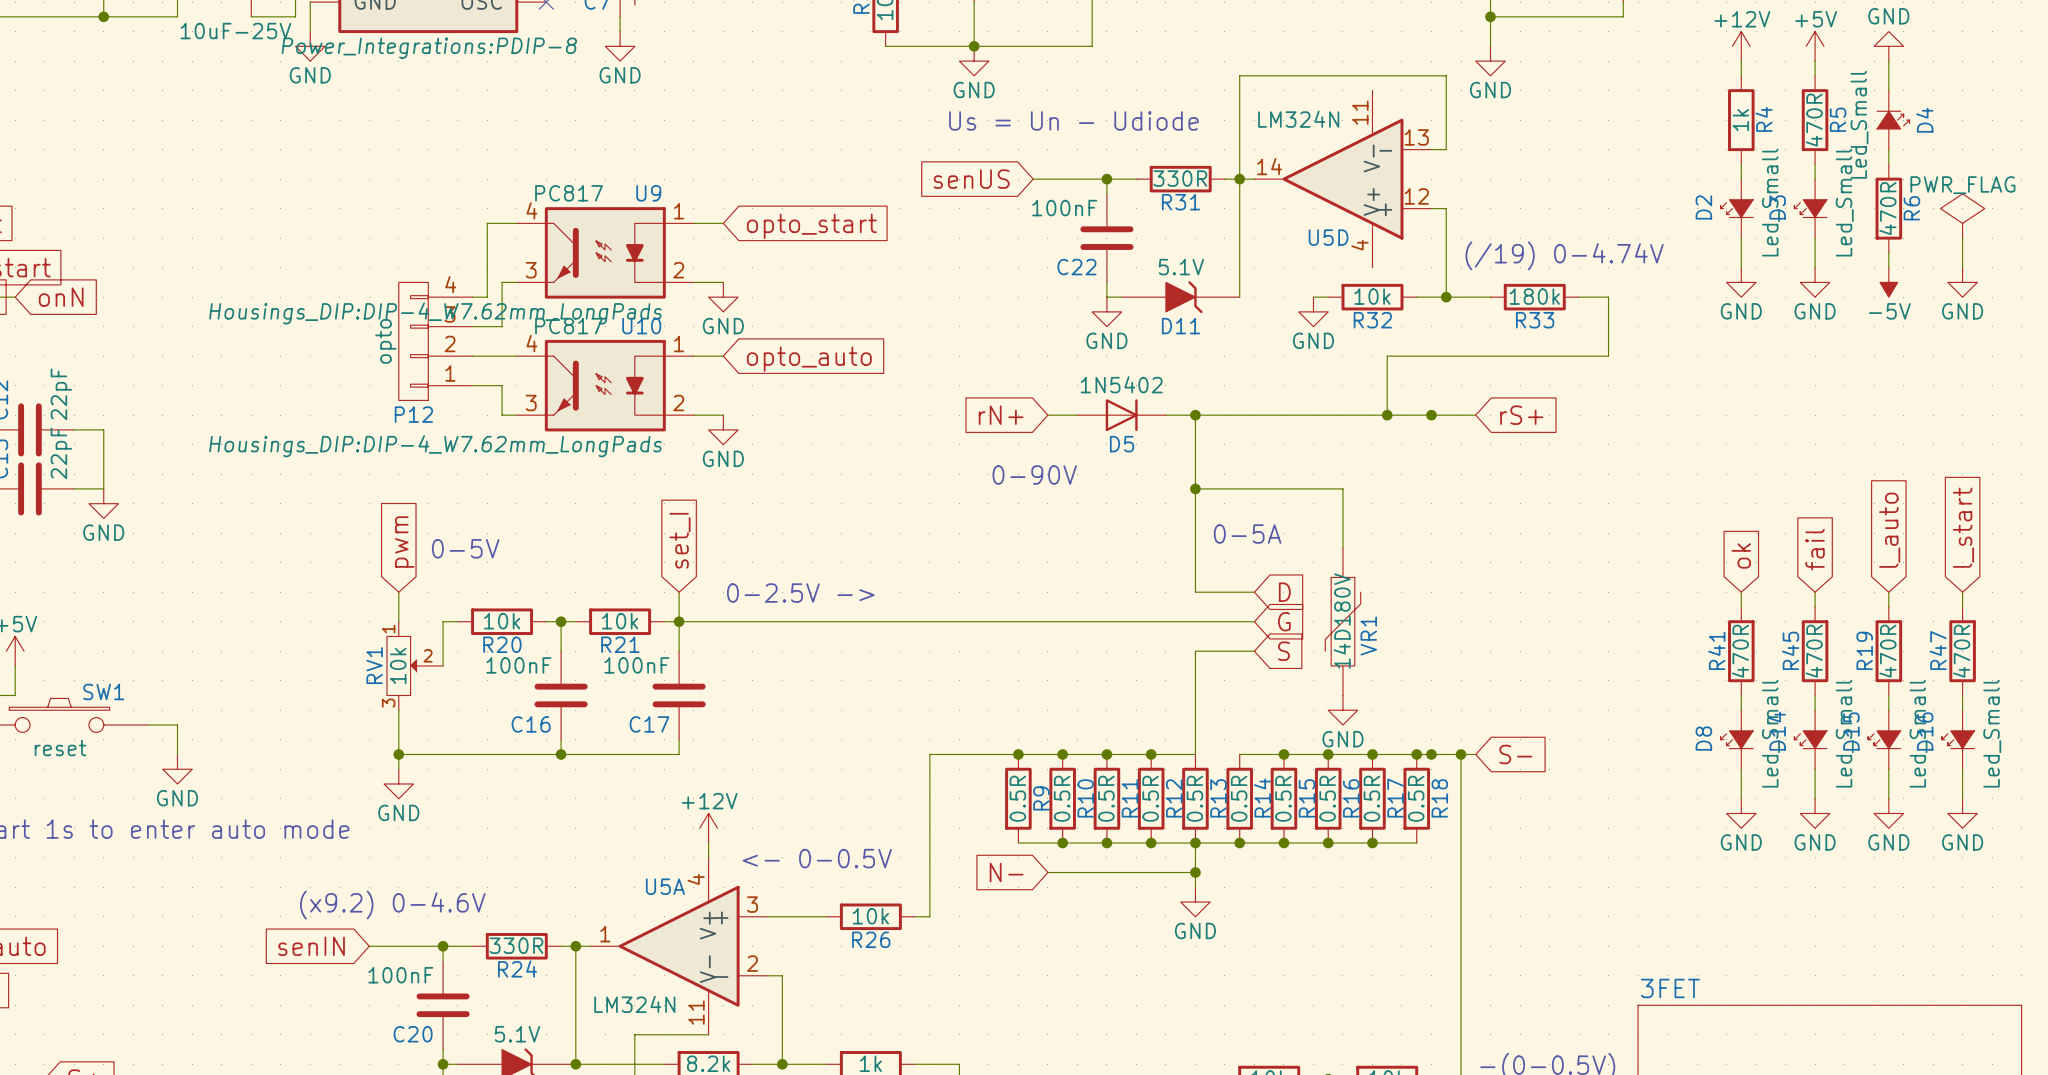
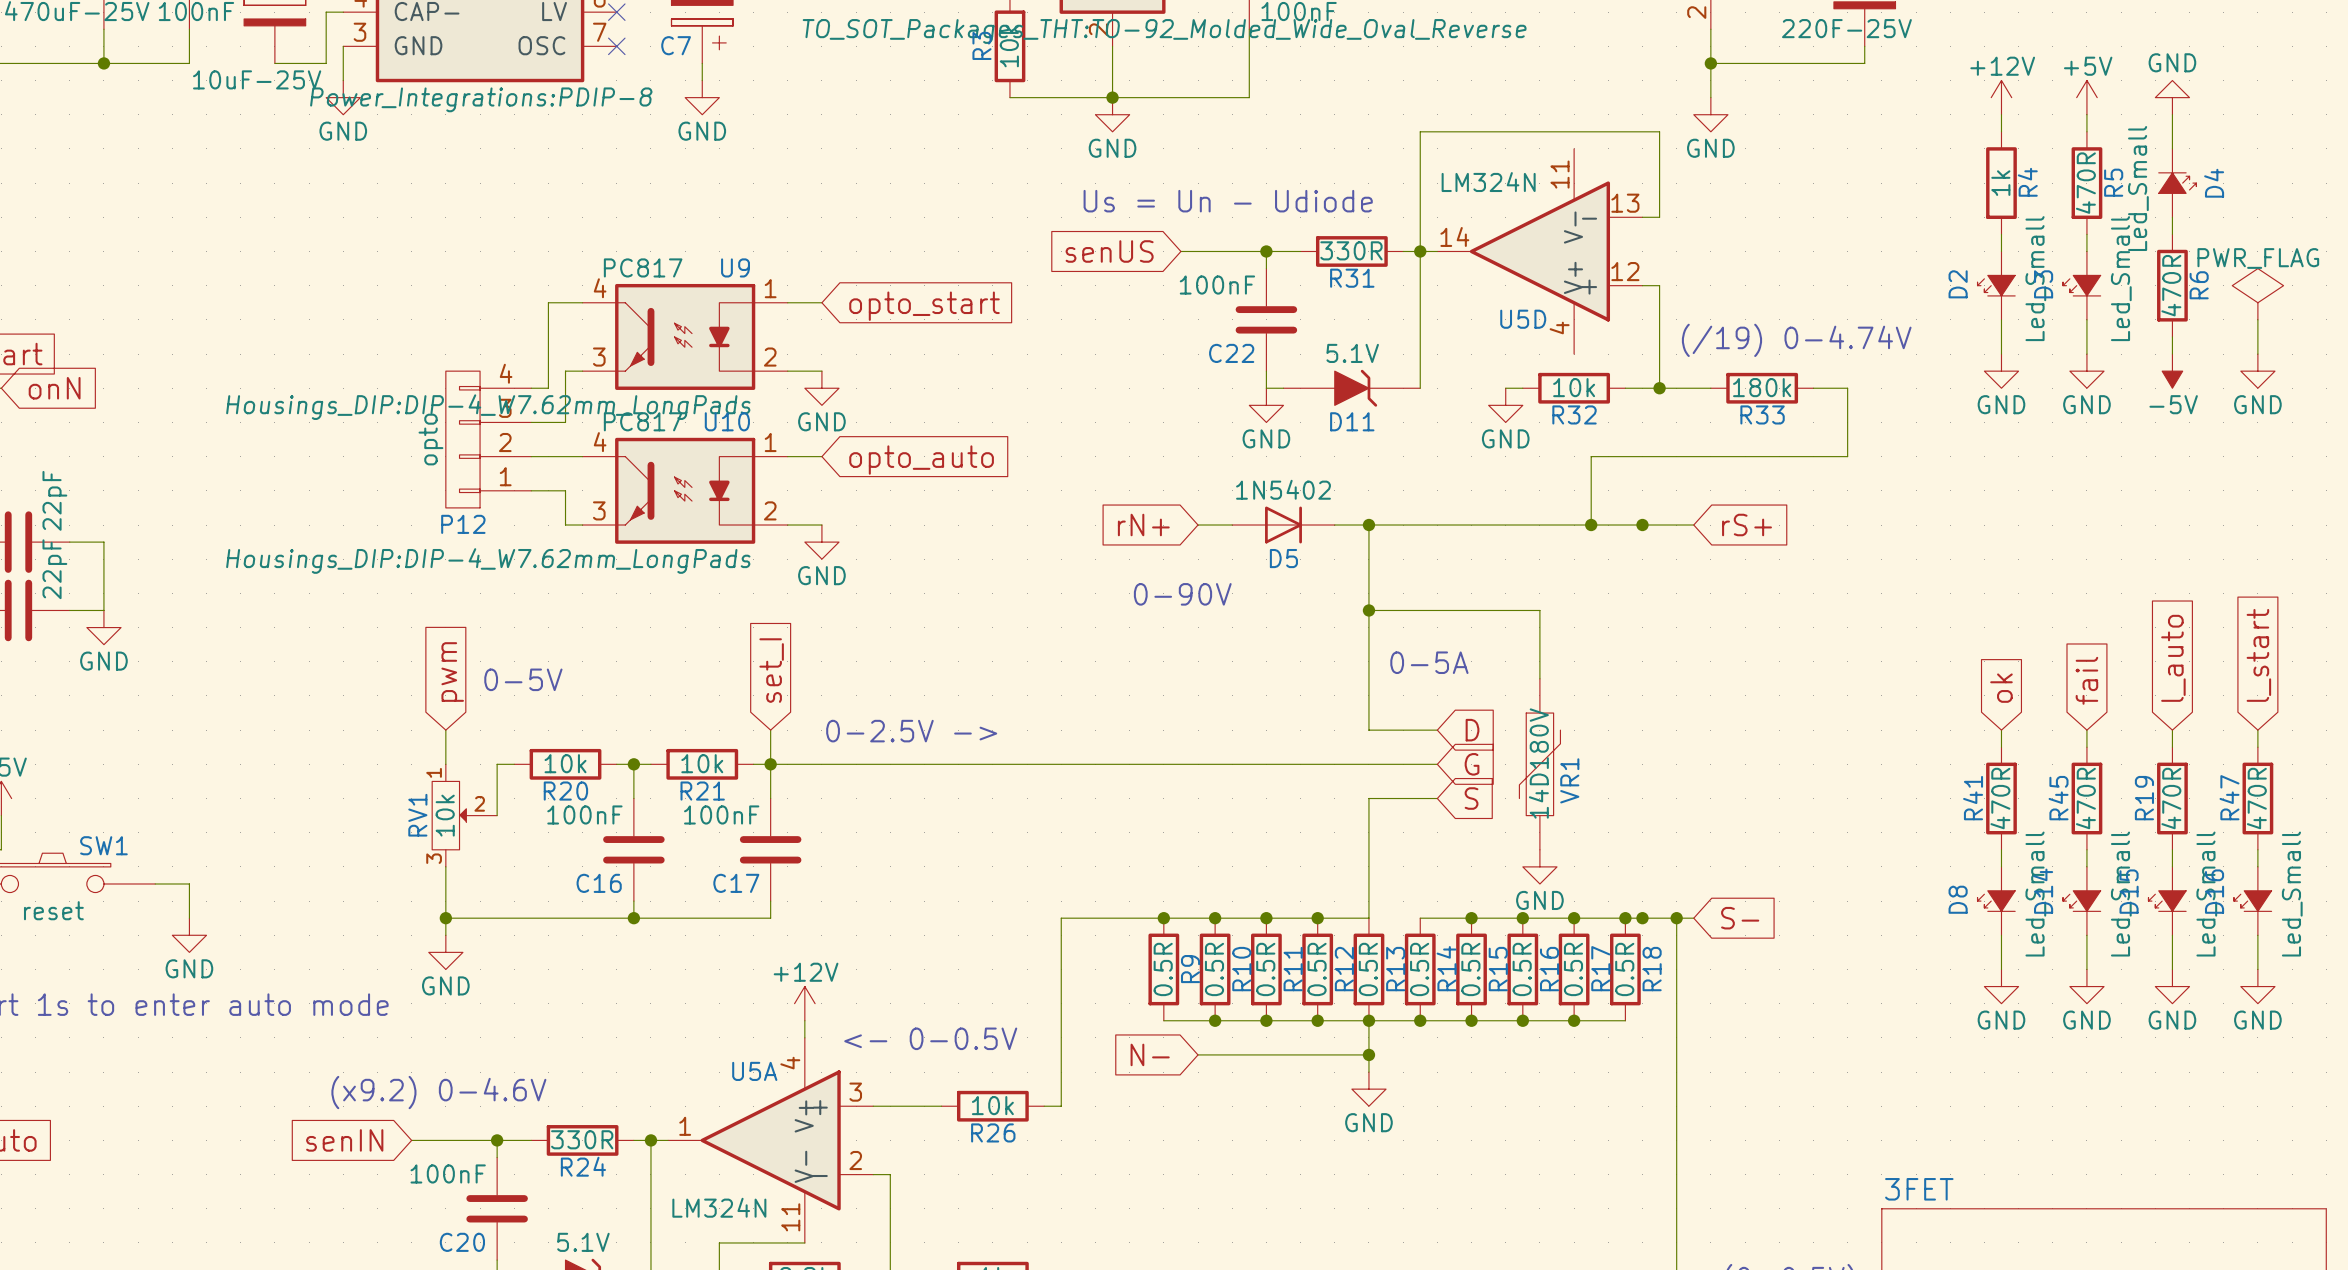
text position: Us = Un - Udiode (1073, 120) -> Us = Un - Udiode (1228, 201)

